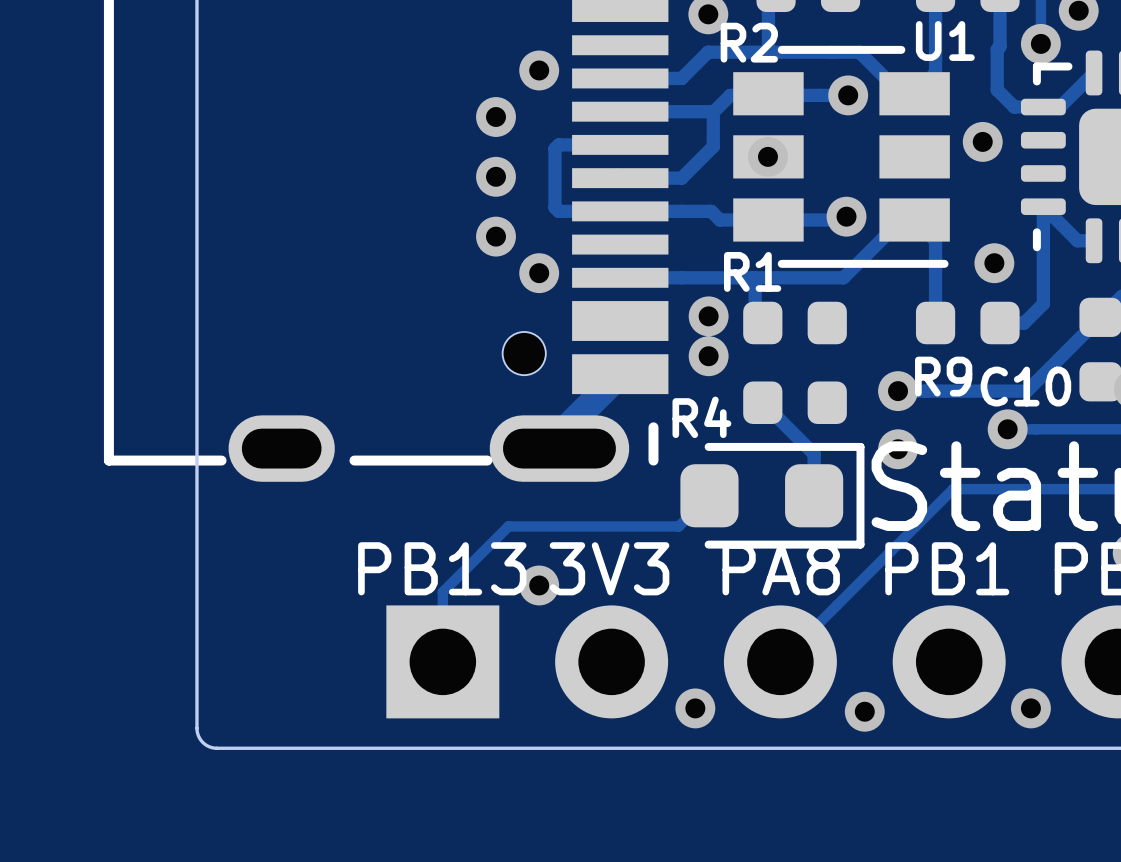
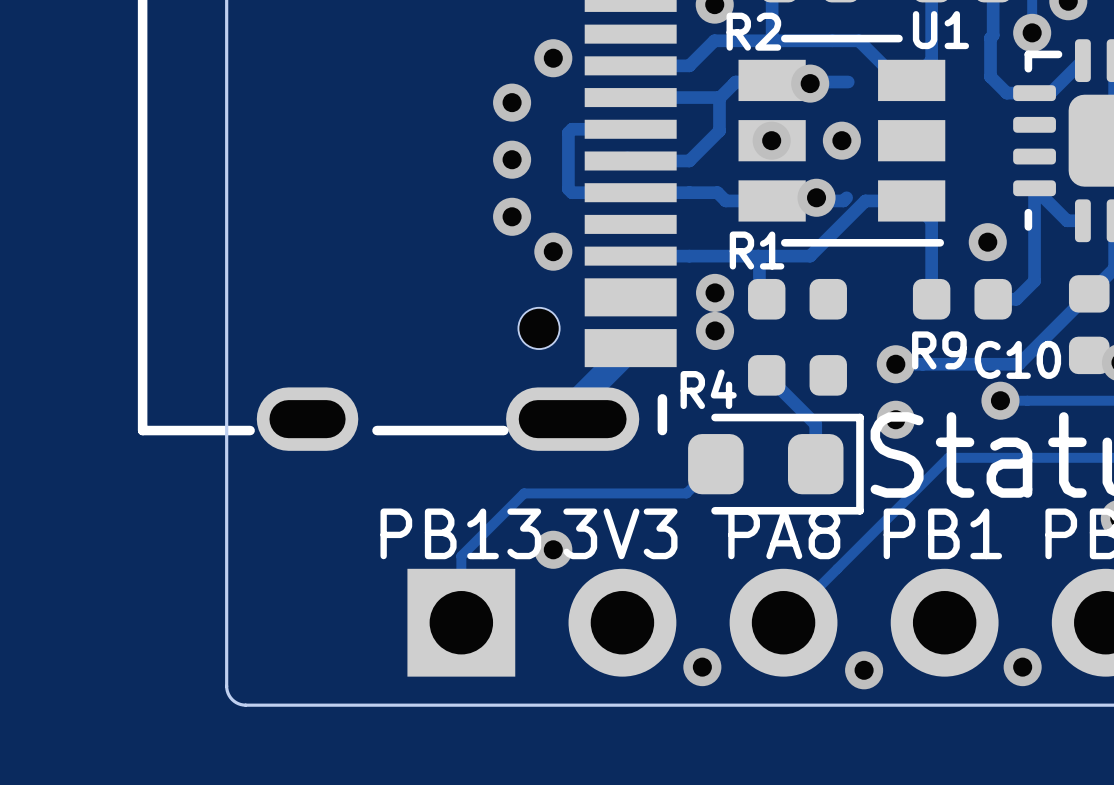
via position: (848, 95) -> (810, 83)
via: (982, 141) -> none
via: none -> (841, 140)
via position: (846, 216) -> (816, 197)
track: (901, 220) (843, 277) (808, 277) -> (898, 200) (865, 200) (810, 256)

